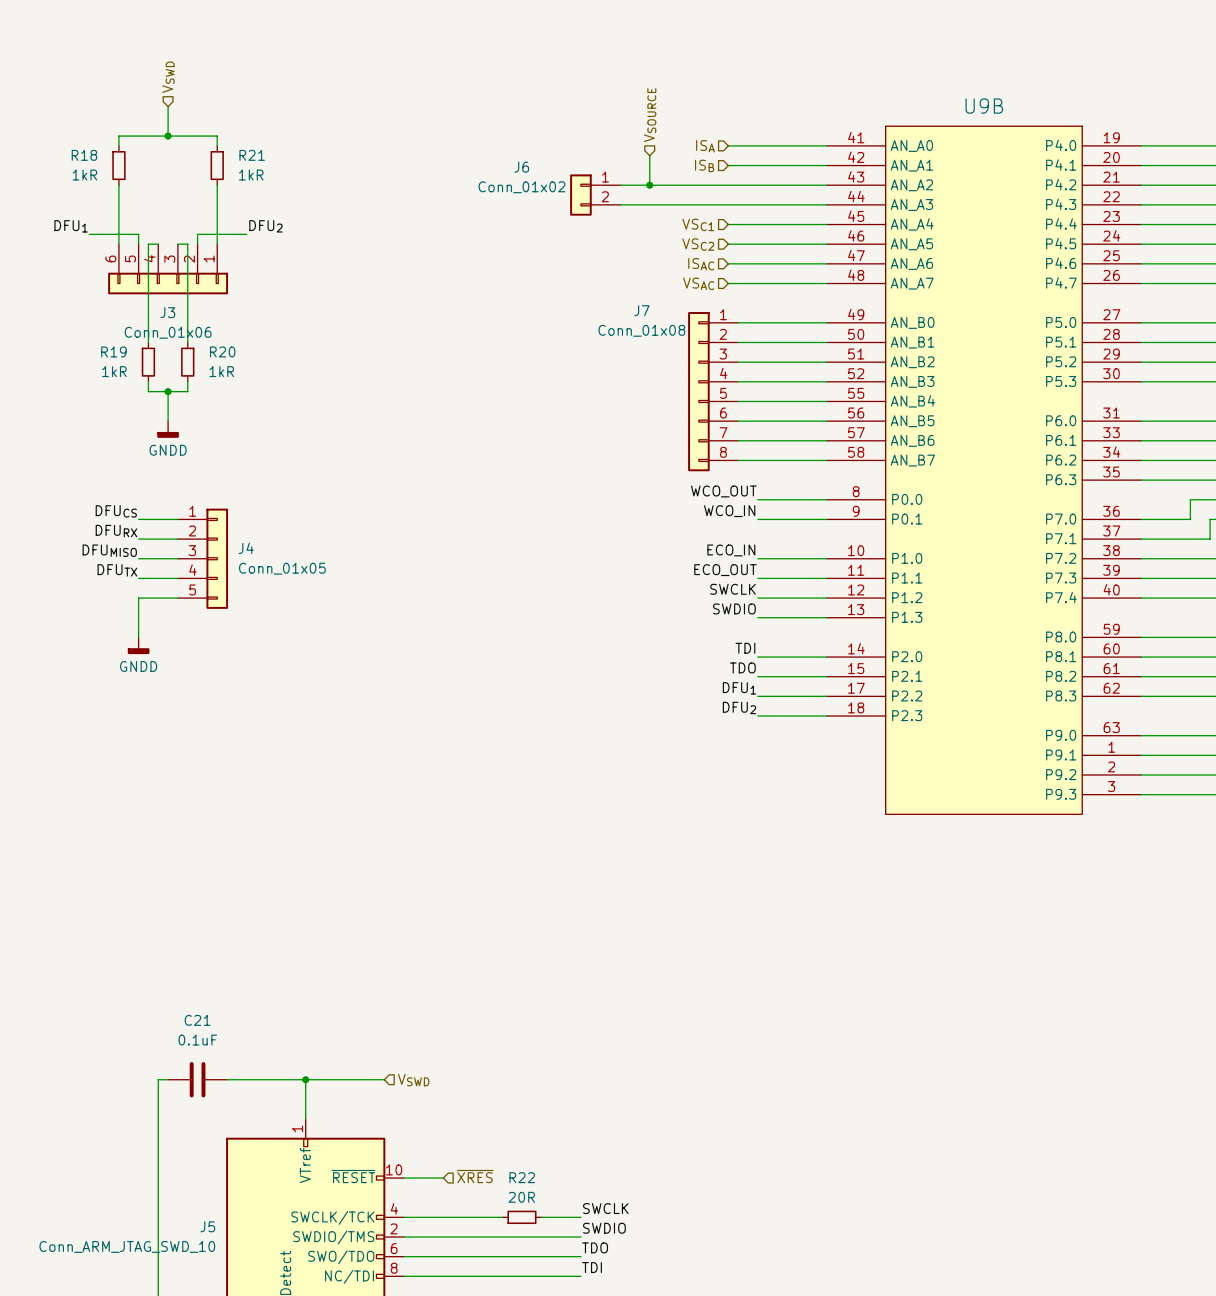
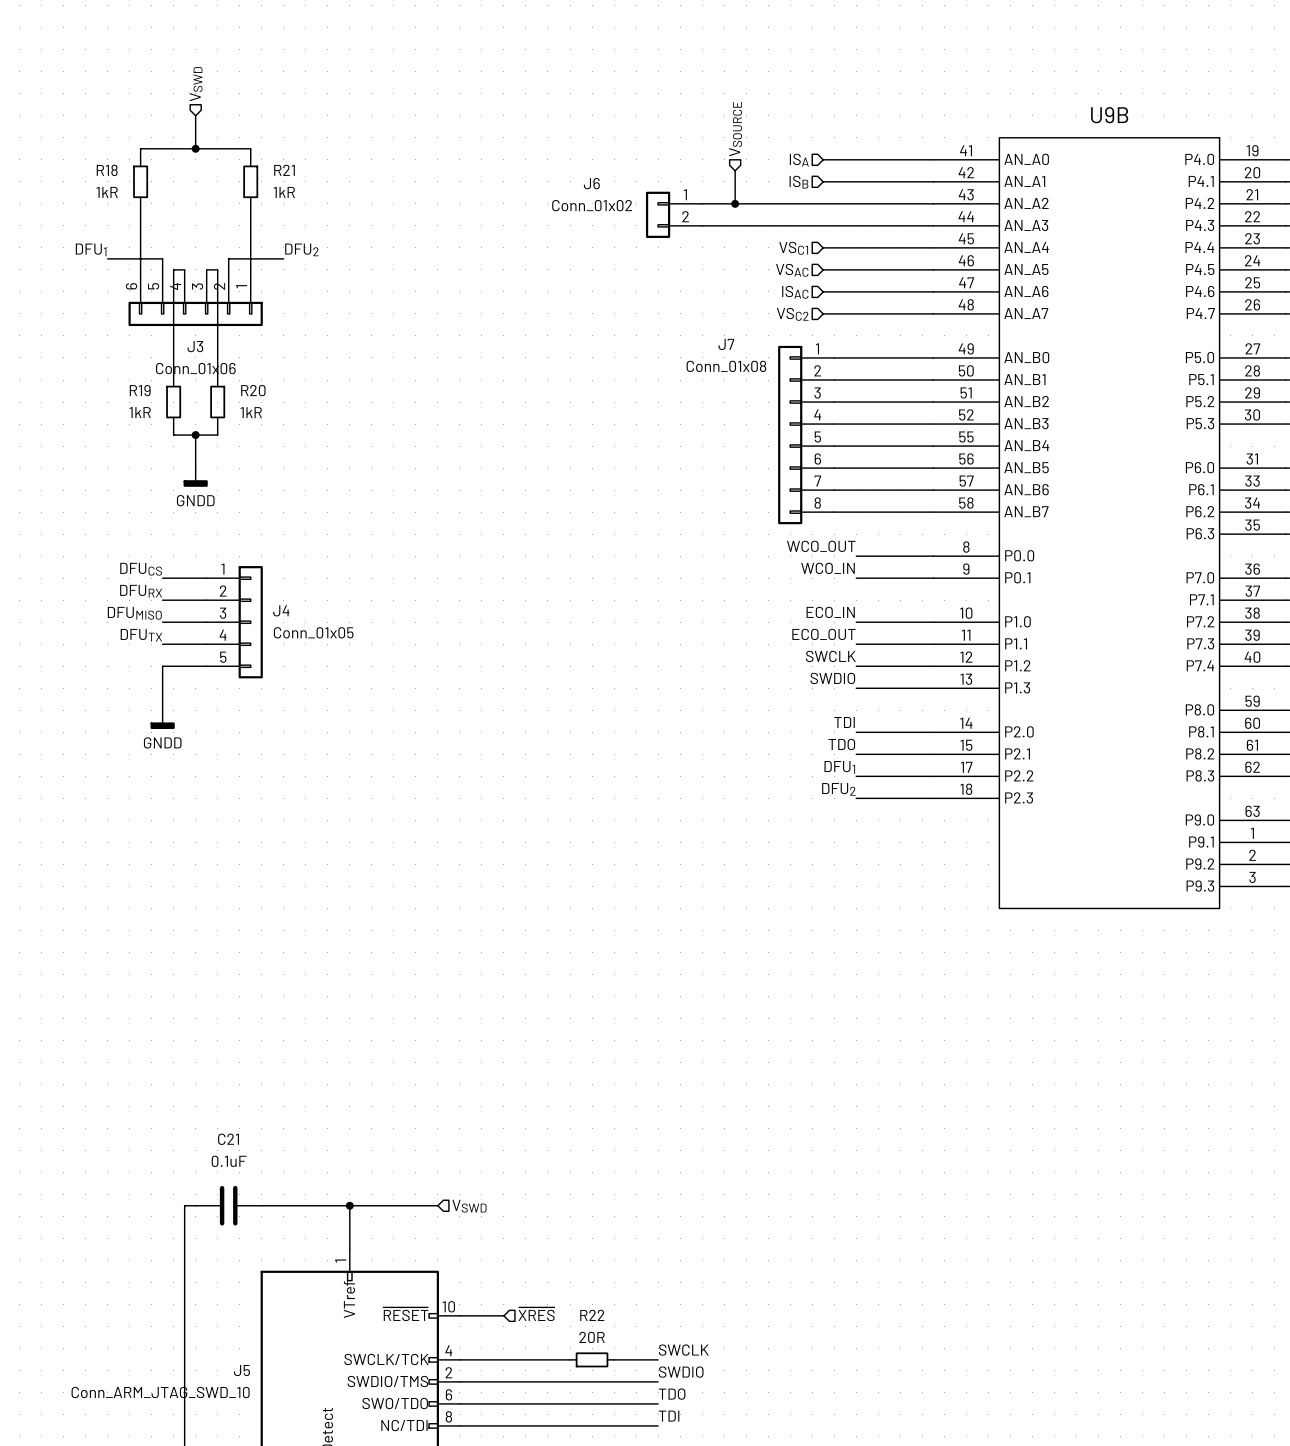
hierarchical label: VSC2 (698, 244) -> VSAC (792, 270)
hierarchical label: VSAC (698, 283) -> VSC2 (792, 314)

